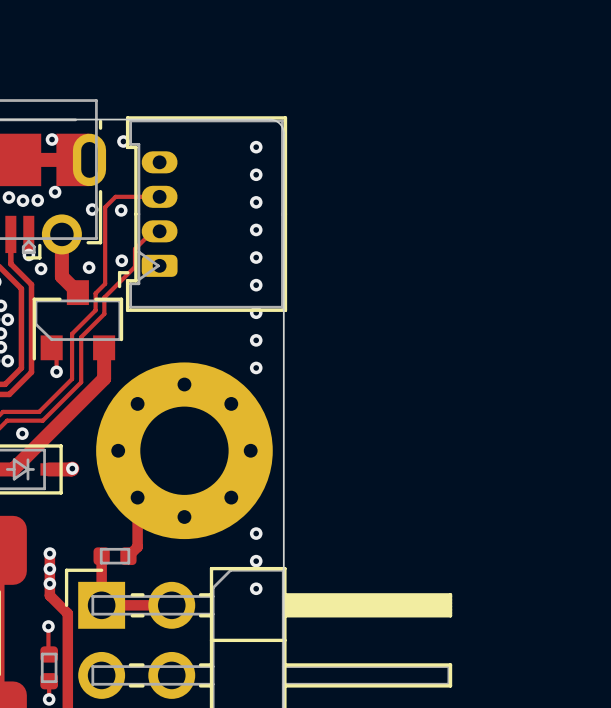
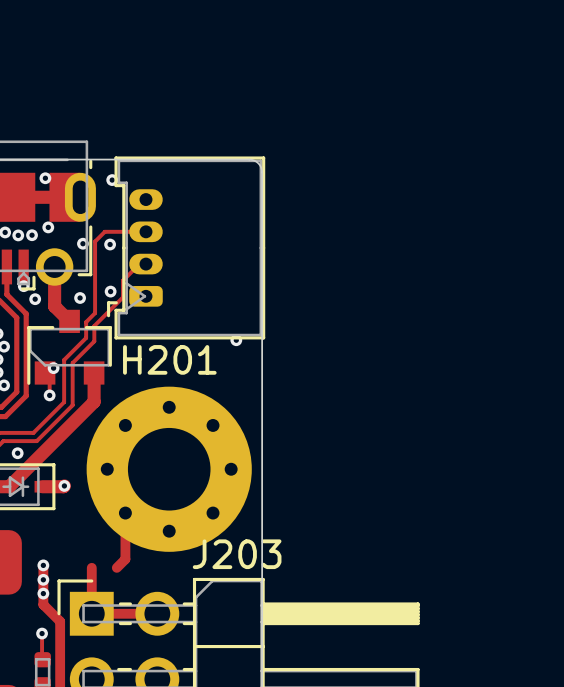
via: (256, 147) -> none
via: (256, 174) -> none
via: (256, 202) -> none
via: (256, 229) -> none
via: (256, 257) -> none
via: (256, 285) -> none
H201 name: none -> H201 (169, 359)
via: (256, 340) -> none
via: none -> (53, 368)
via: (256, 367) -> none
via: (256, 533) -> none
J203 name: none -> J203 (237, 554)
part: (115, 556) -> none
via: (256, 561) -> none
via: (256, 588) -> none

